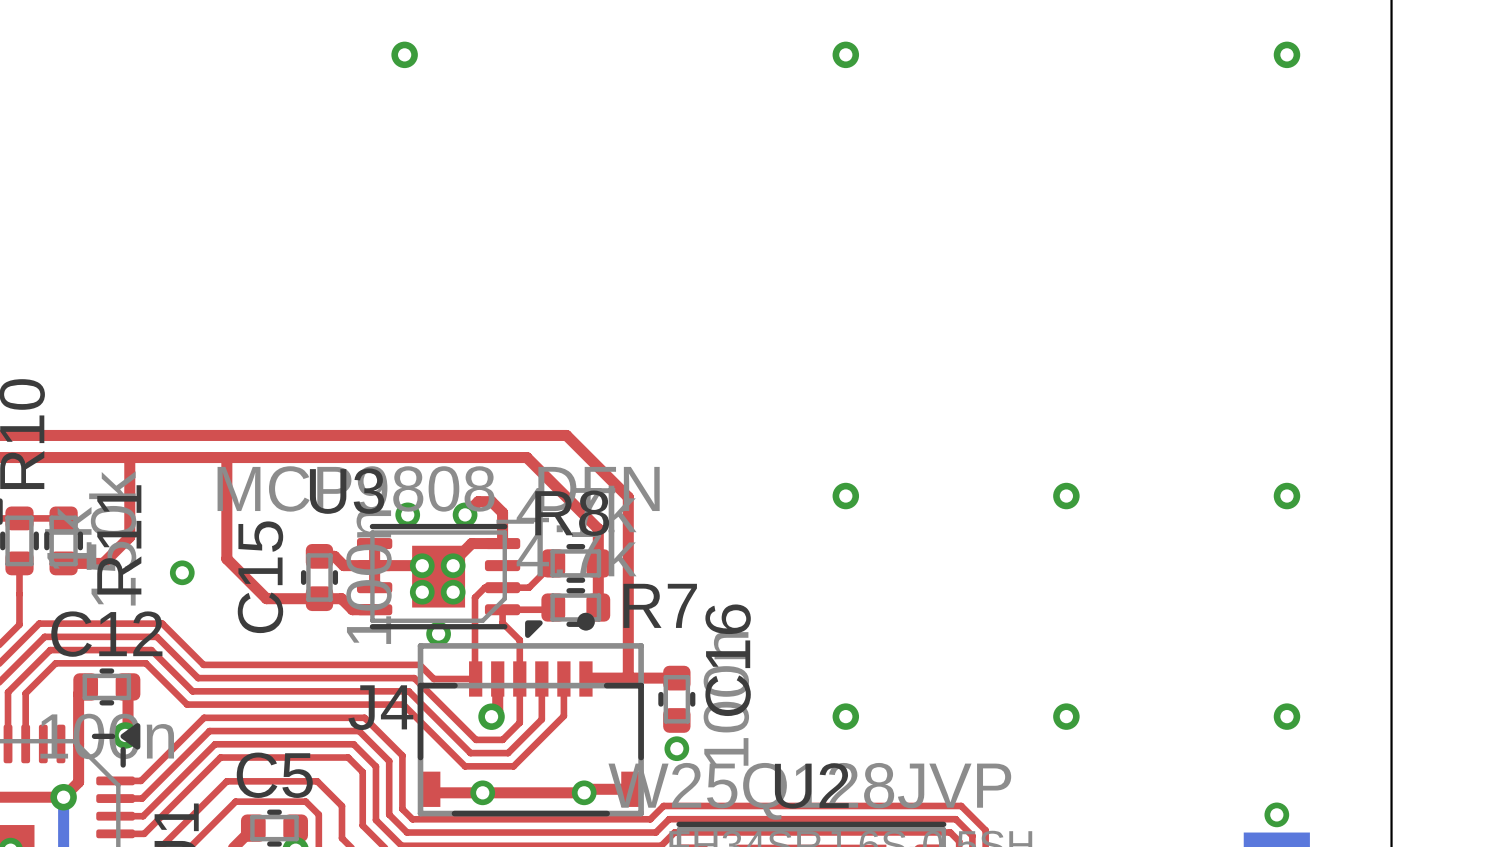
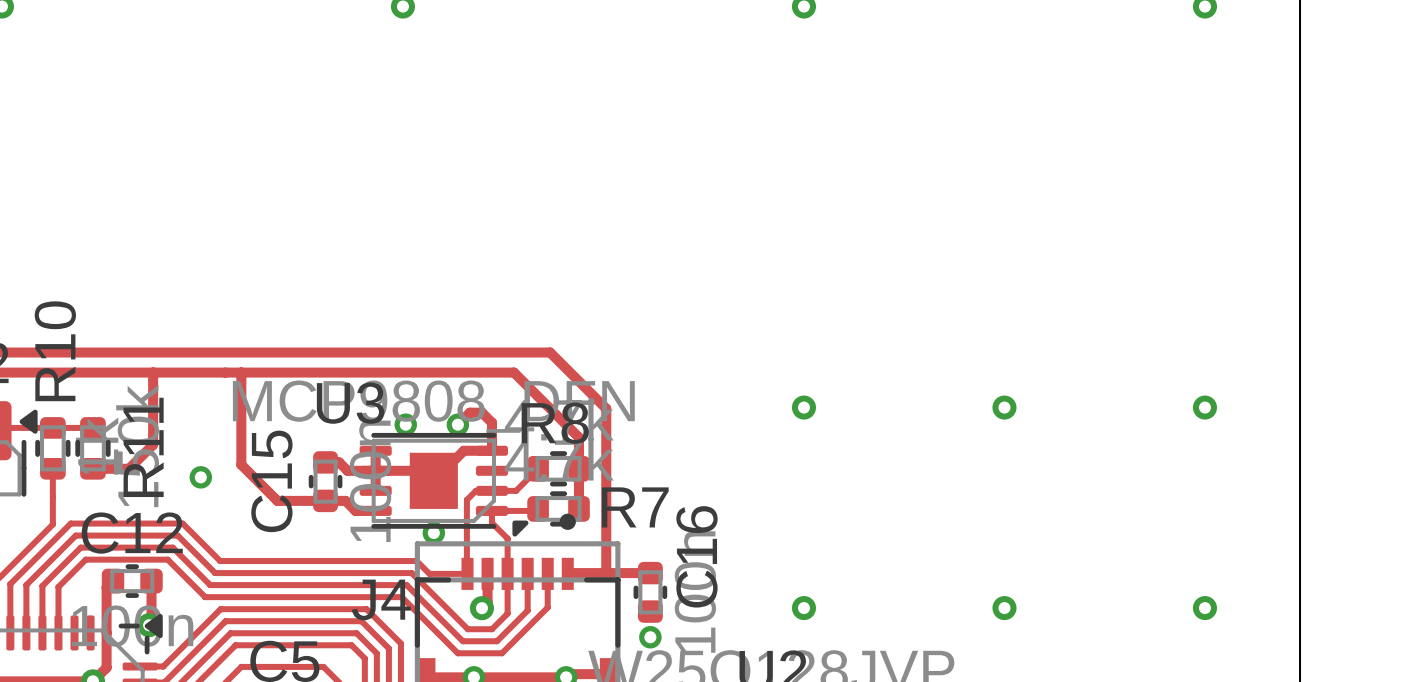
via: (422, 565) -> none
via: (453, 565) -> none
via: (422, 592) -> none
via: (453, 592) -> none

